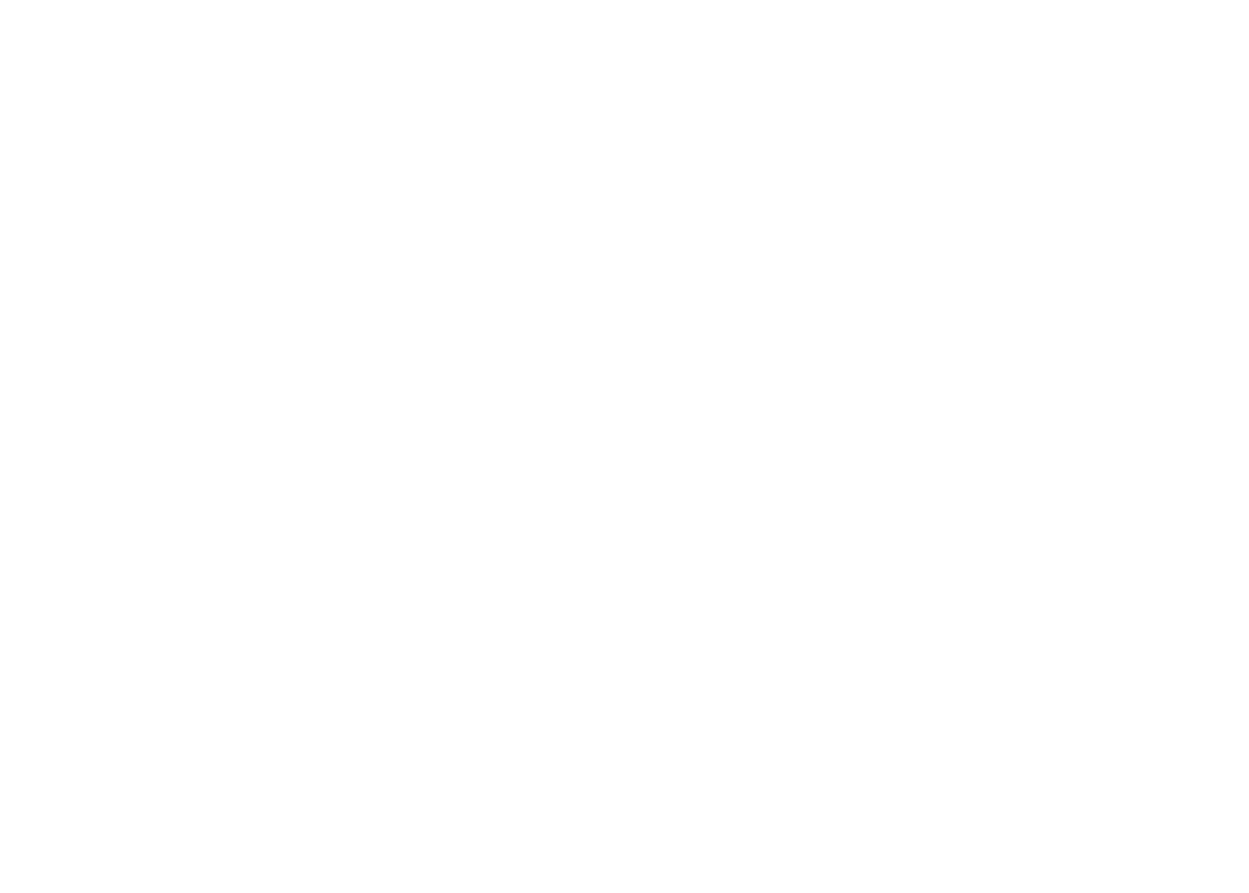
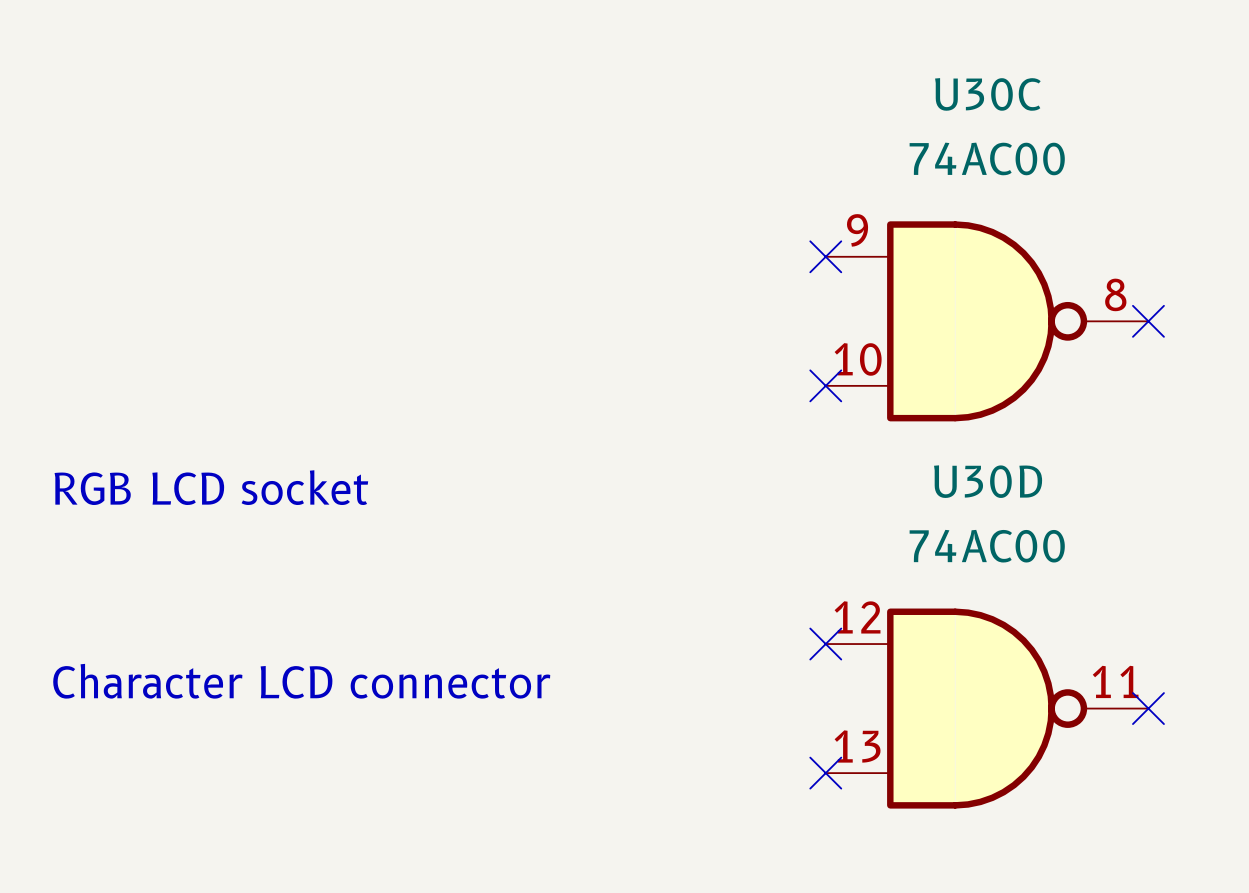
no-connect mark: none -> (825, 256)
U30C: none -> 74AC00 (987, 321)
no-connect mark: none -> (1148, 321)
no-connect mark: none -> (825, 385)
text: none -> RGB LCD socket (211, 487)
no-connect mark: none -> (825, 644)
text: none -> Character LCD connector (301, 681)
U30D: none -> 74AC00 (987, 708)
no-connect mark: none -> (1148, 708)
no-connect mark: none -> (825, 773)

